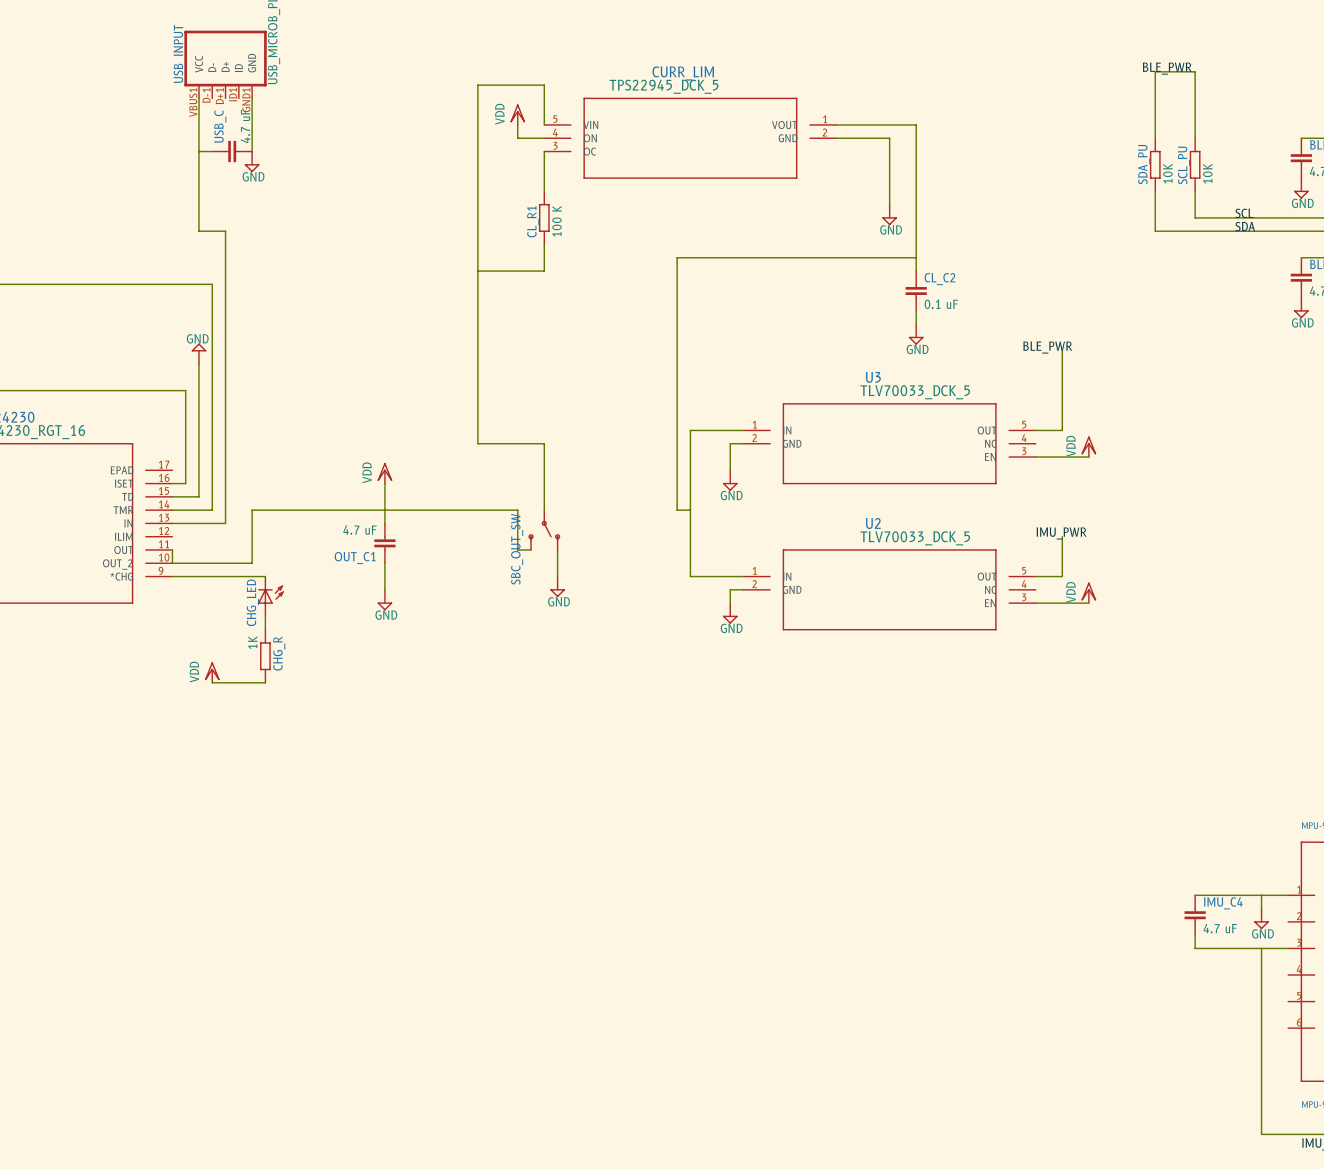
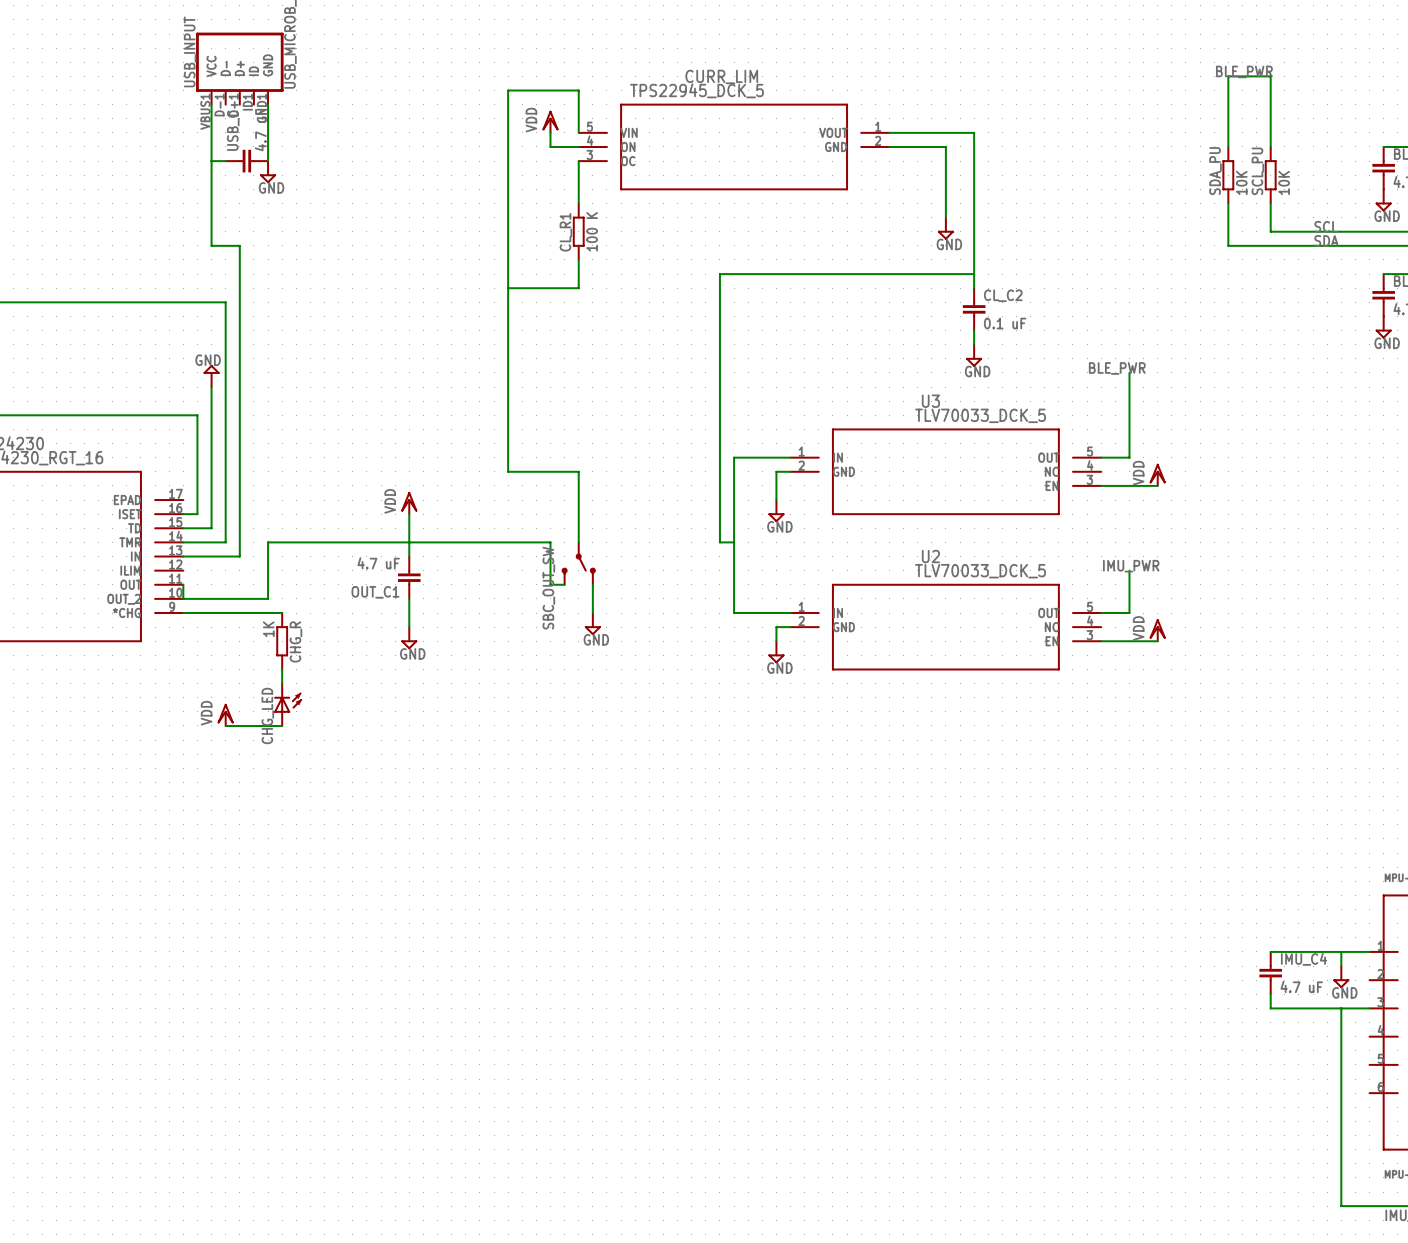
CHG_LED position: (270, 596) -> (288, 704)
CHG_R position: (265, 656) -> (282, 641)

